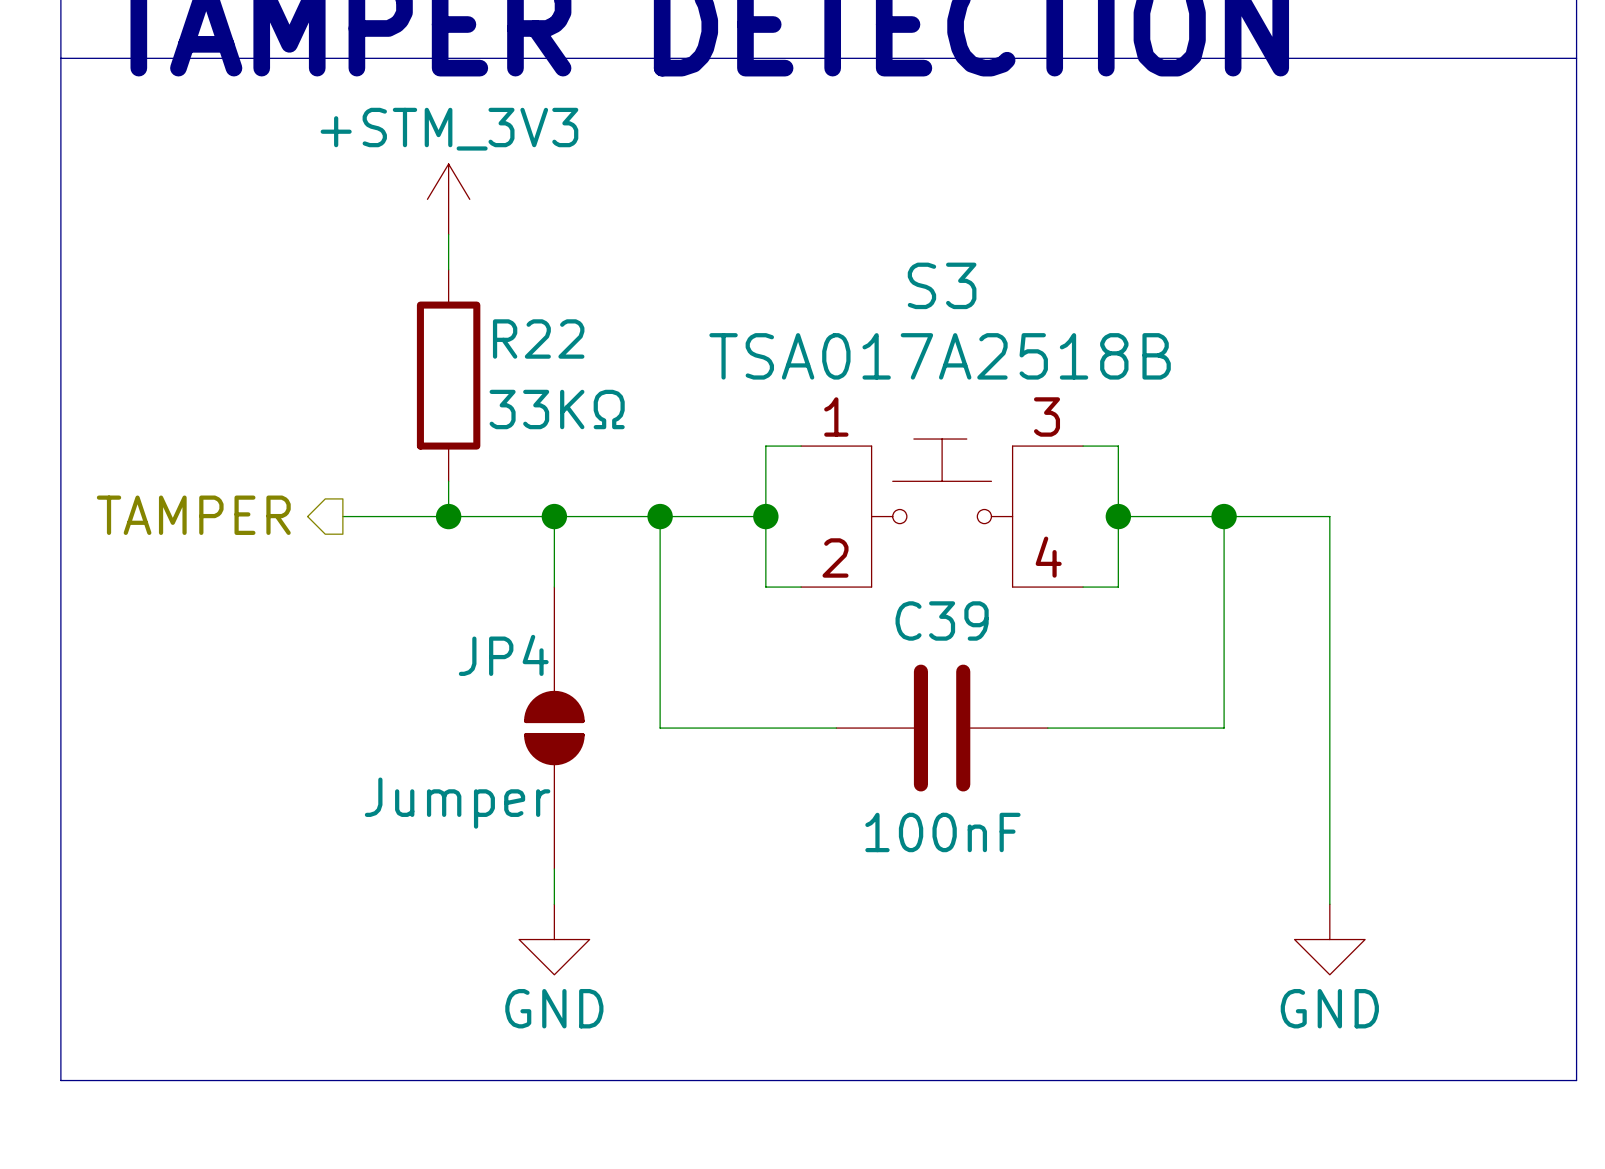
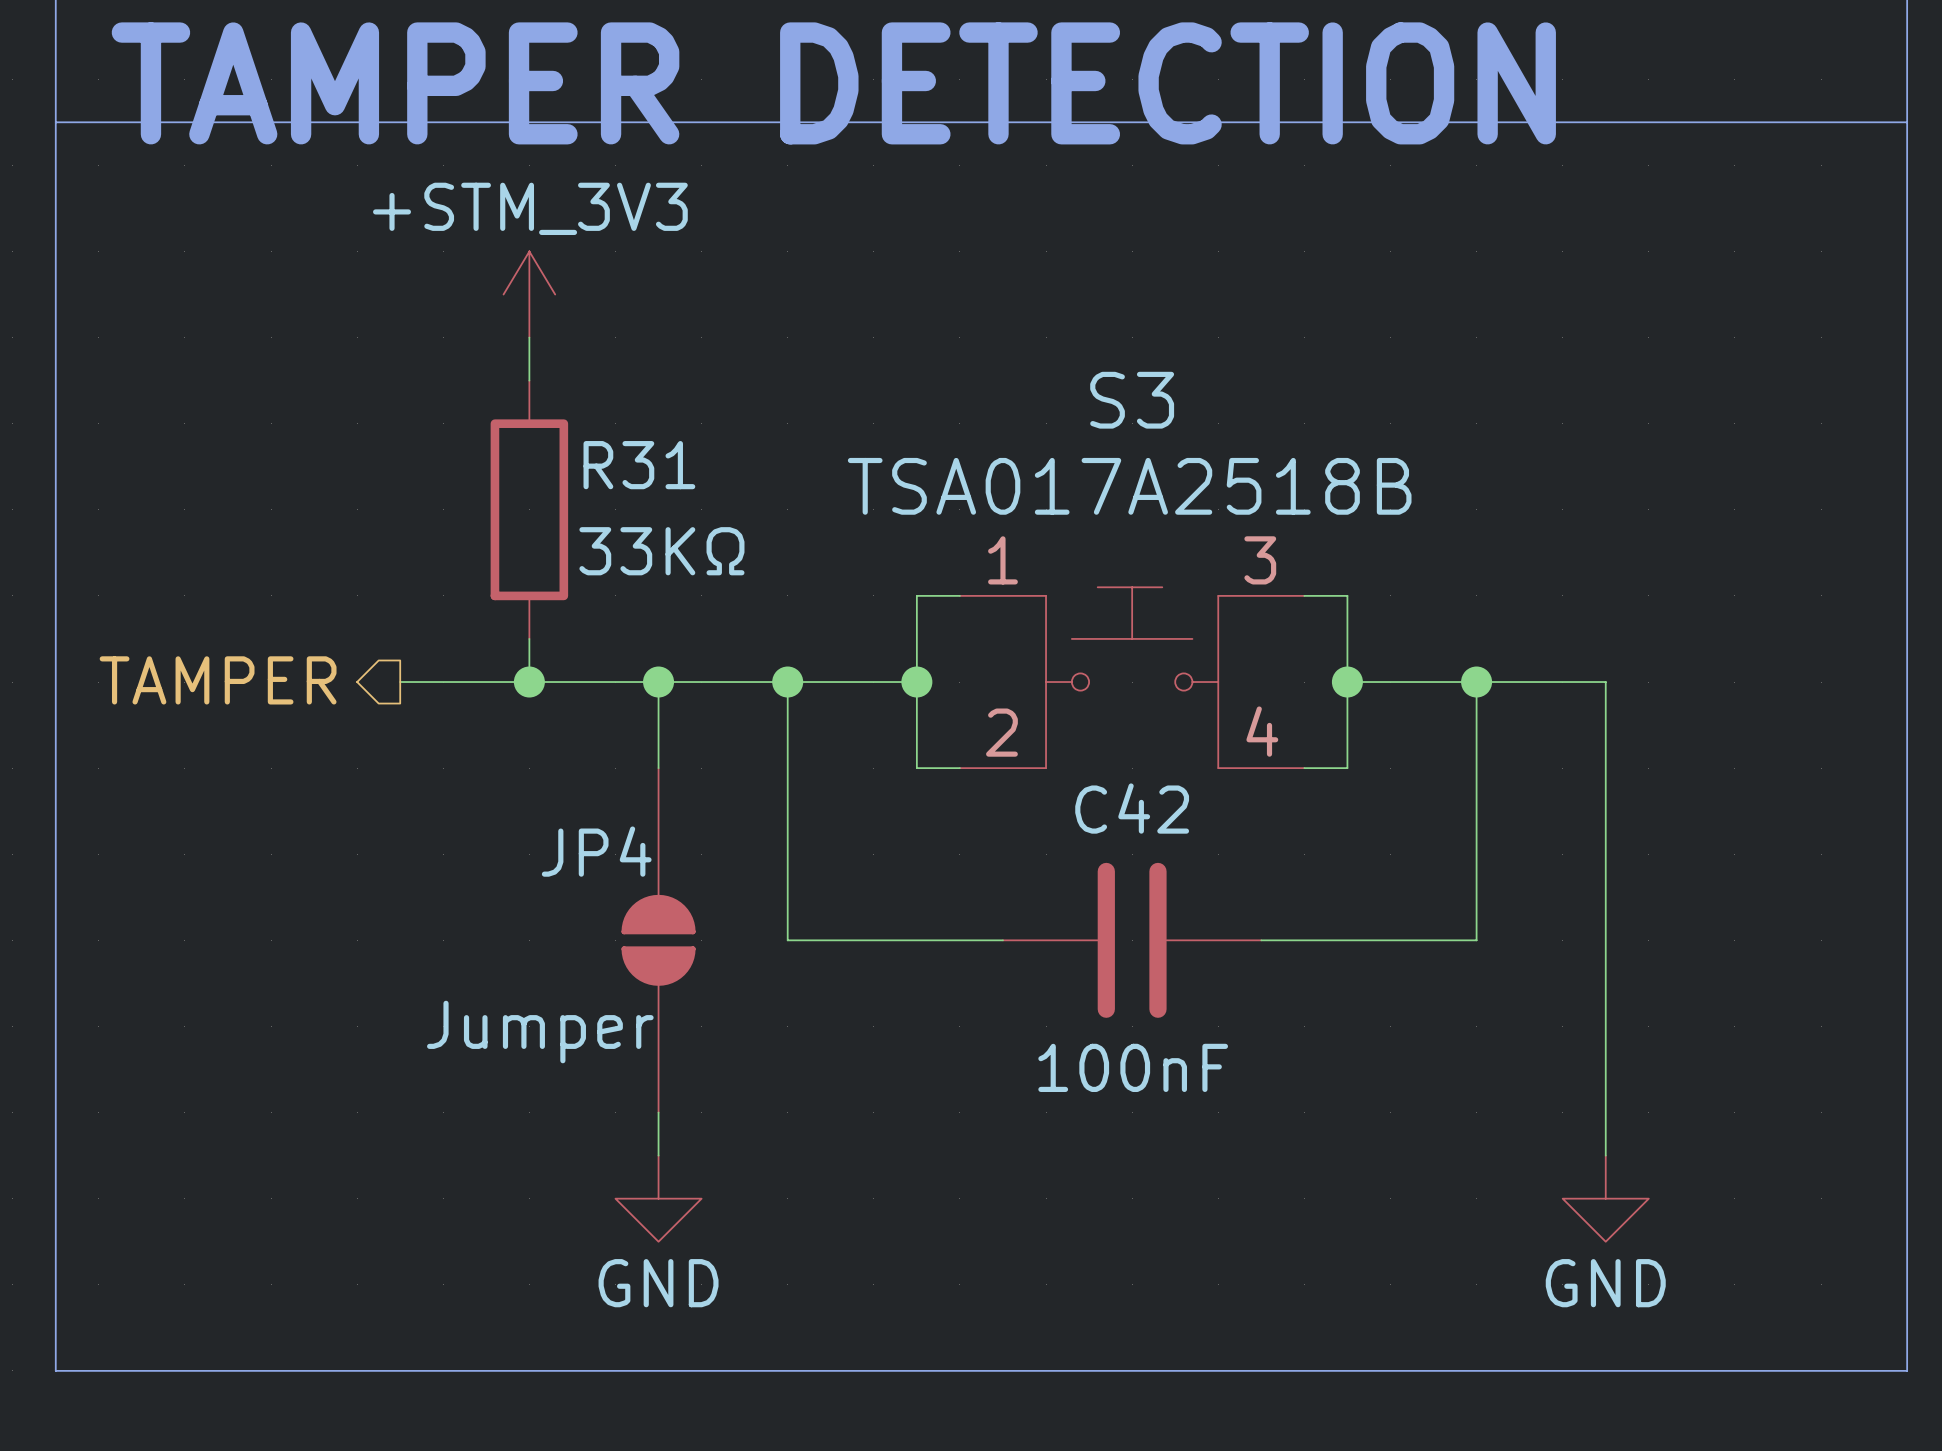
R22 name: R22 (538, 339) -> R31 (639, 465)
C39 name: C39 (942, 620) -> C42 (1132, 808)

